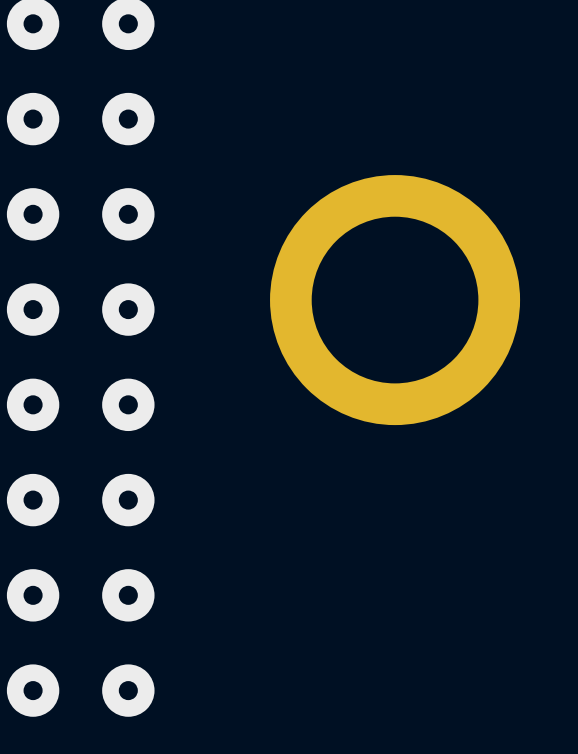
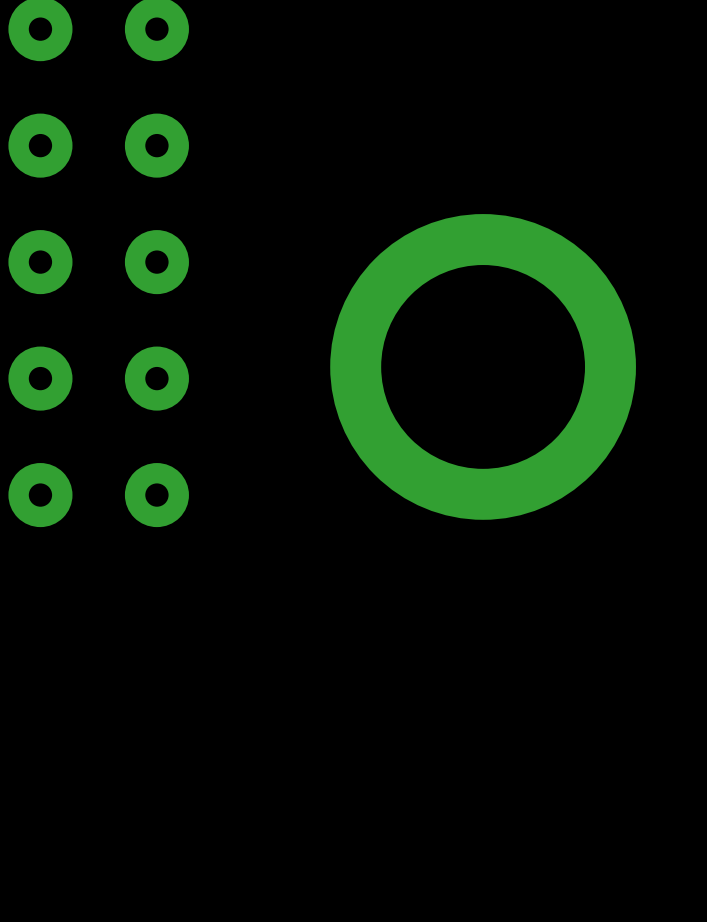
via: (33, 500) -> none
via: (128, 500) -> none
via: (33, 595) -> none
via: (128, 595) -> none
via: (33, 690) -> none
via: (128, 690) -> none

